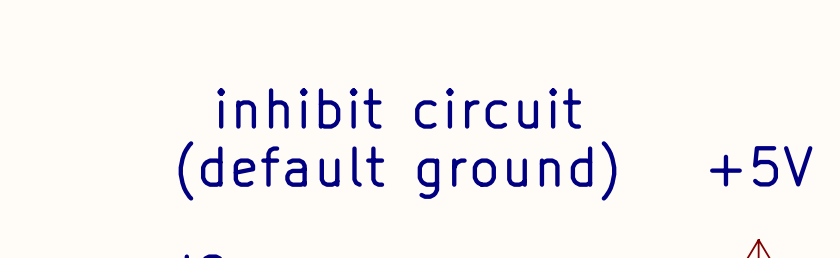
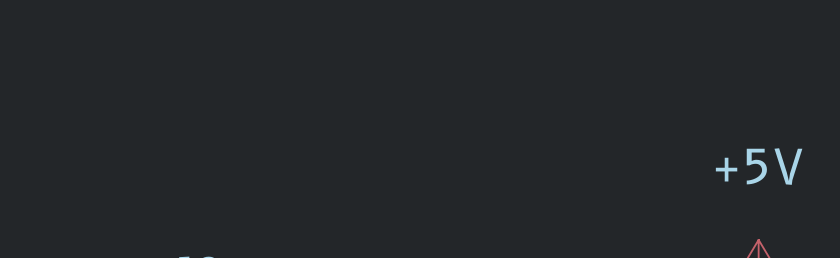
text: inhibit circuit (399, 108) -> none
text: (default ground) (397, 170) -> none

